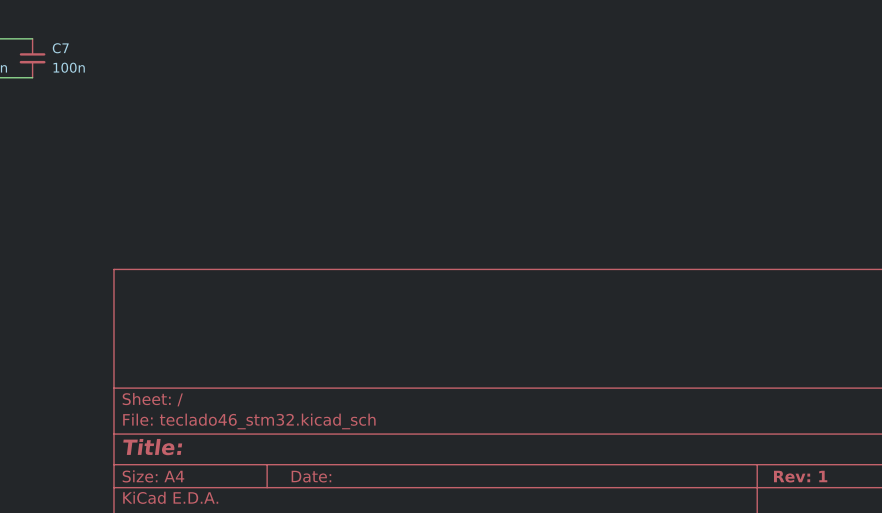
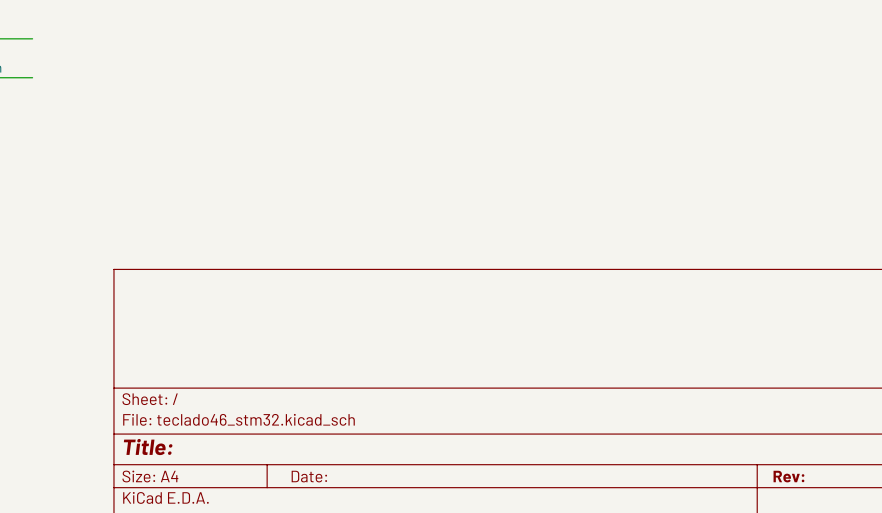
C7: 100n (32, 58) -> none
title block: Rev: 1 (800, 476) -> Rev: (788, 476)

